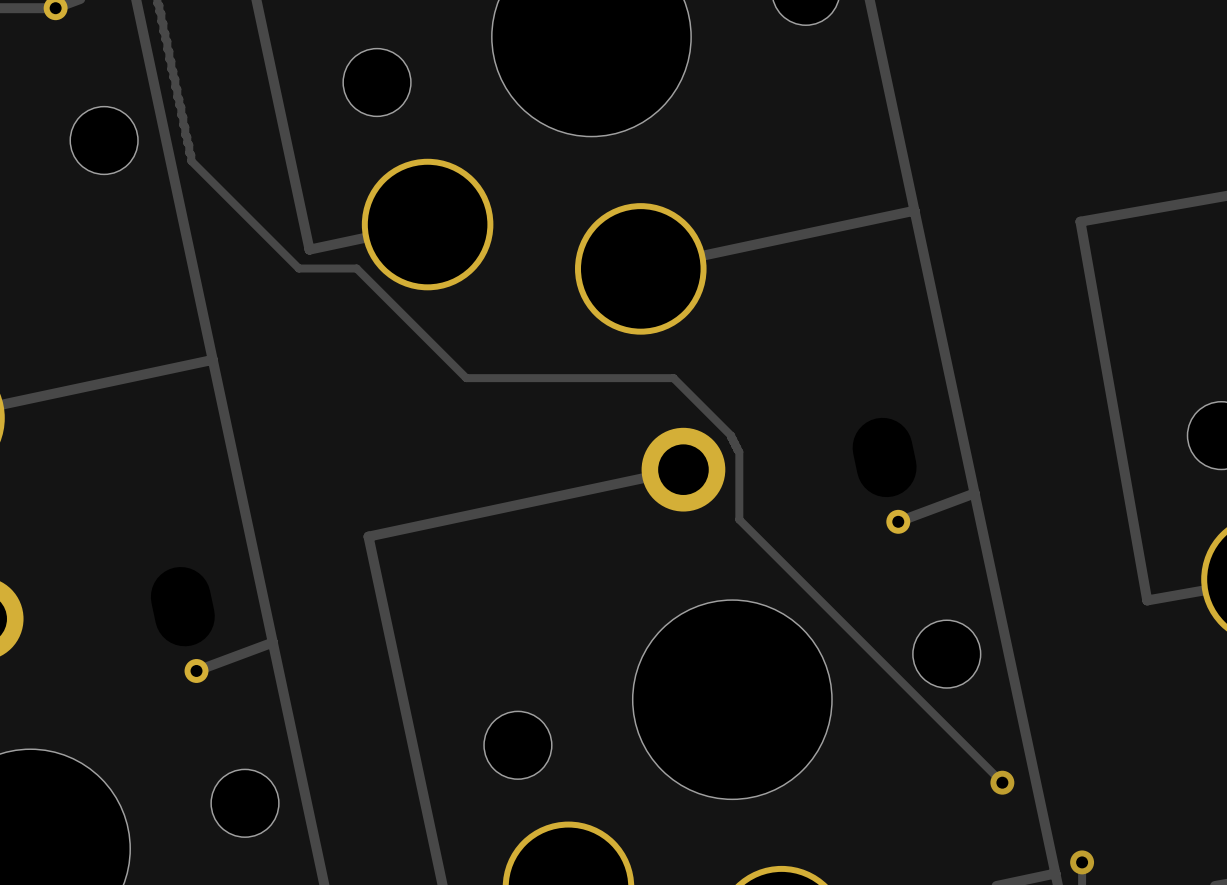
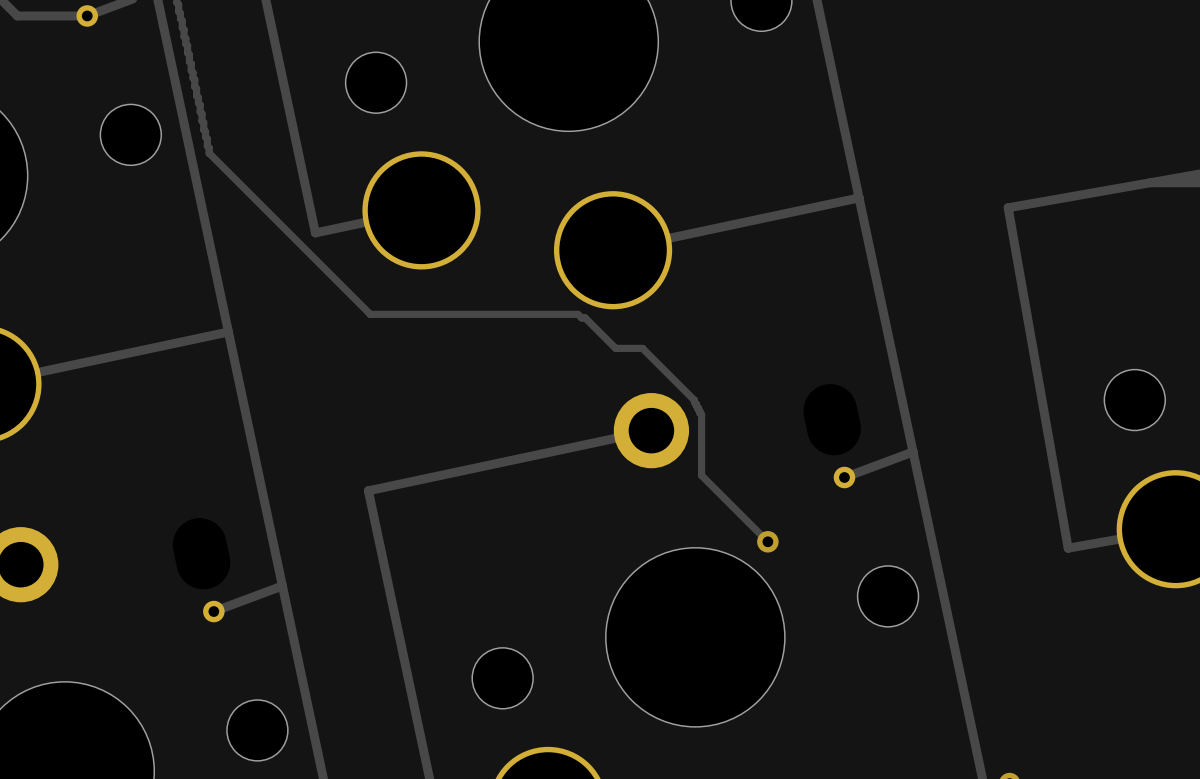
track: (298, 268) (356, 268) (466, 378) (643, 378) -> (305, 249) (370, 314) (578, 314) (581, 317) (585, 317) (615, 348)
track: (813, 593) (1002, 782) -> none
via: none -> (767, 541)
via: (1002, 782) -> none

